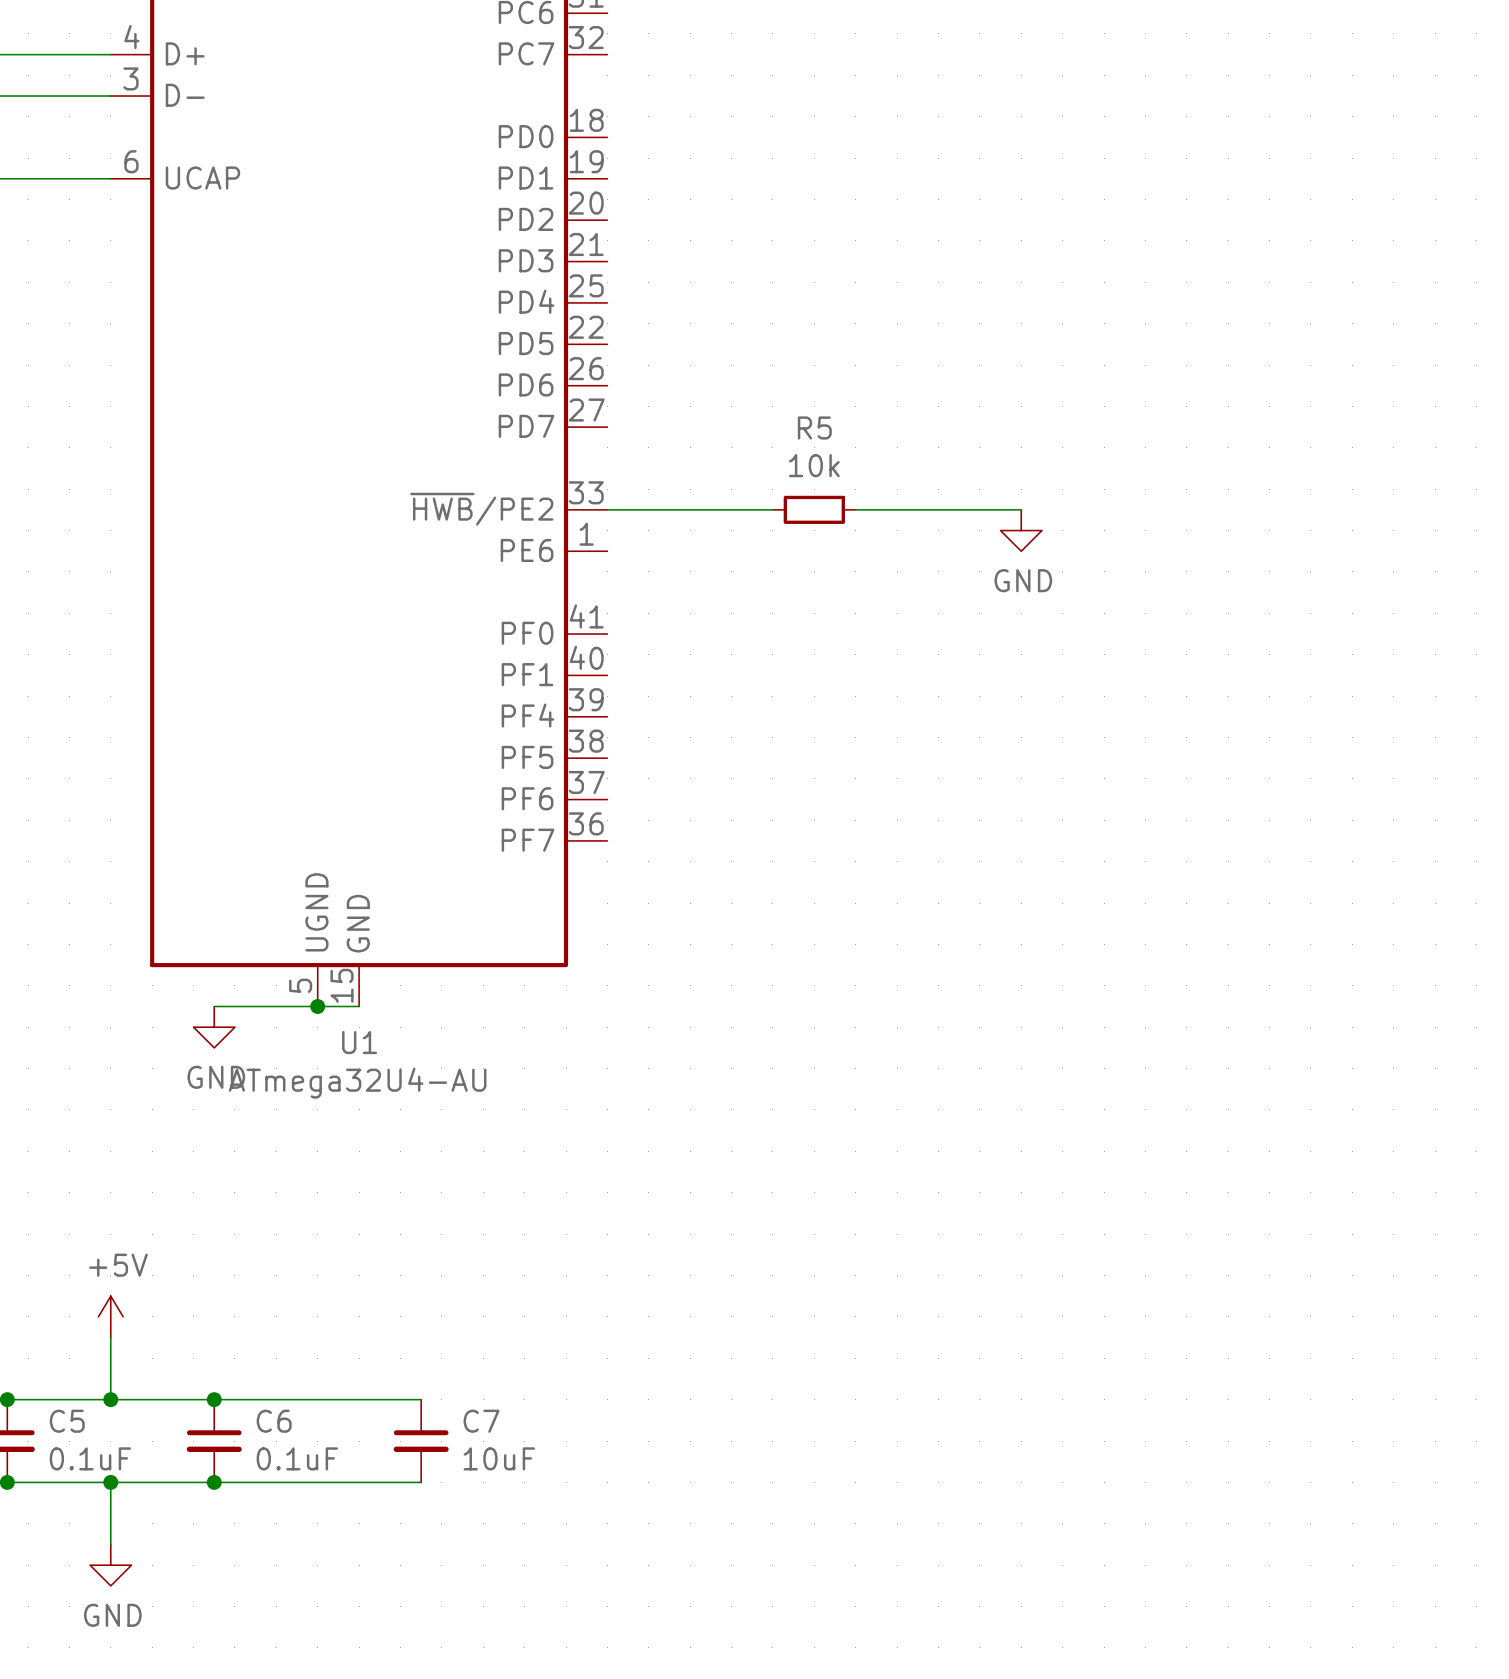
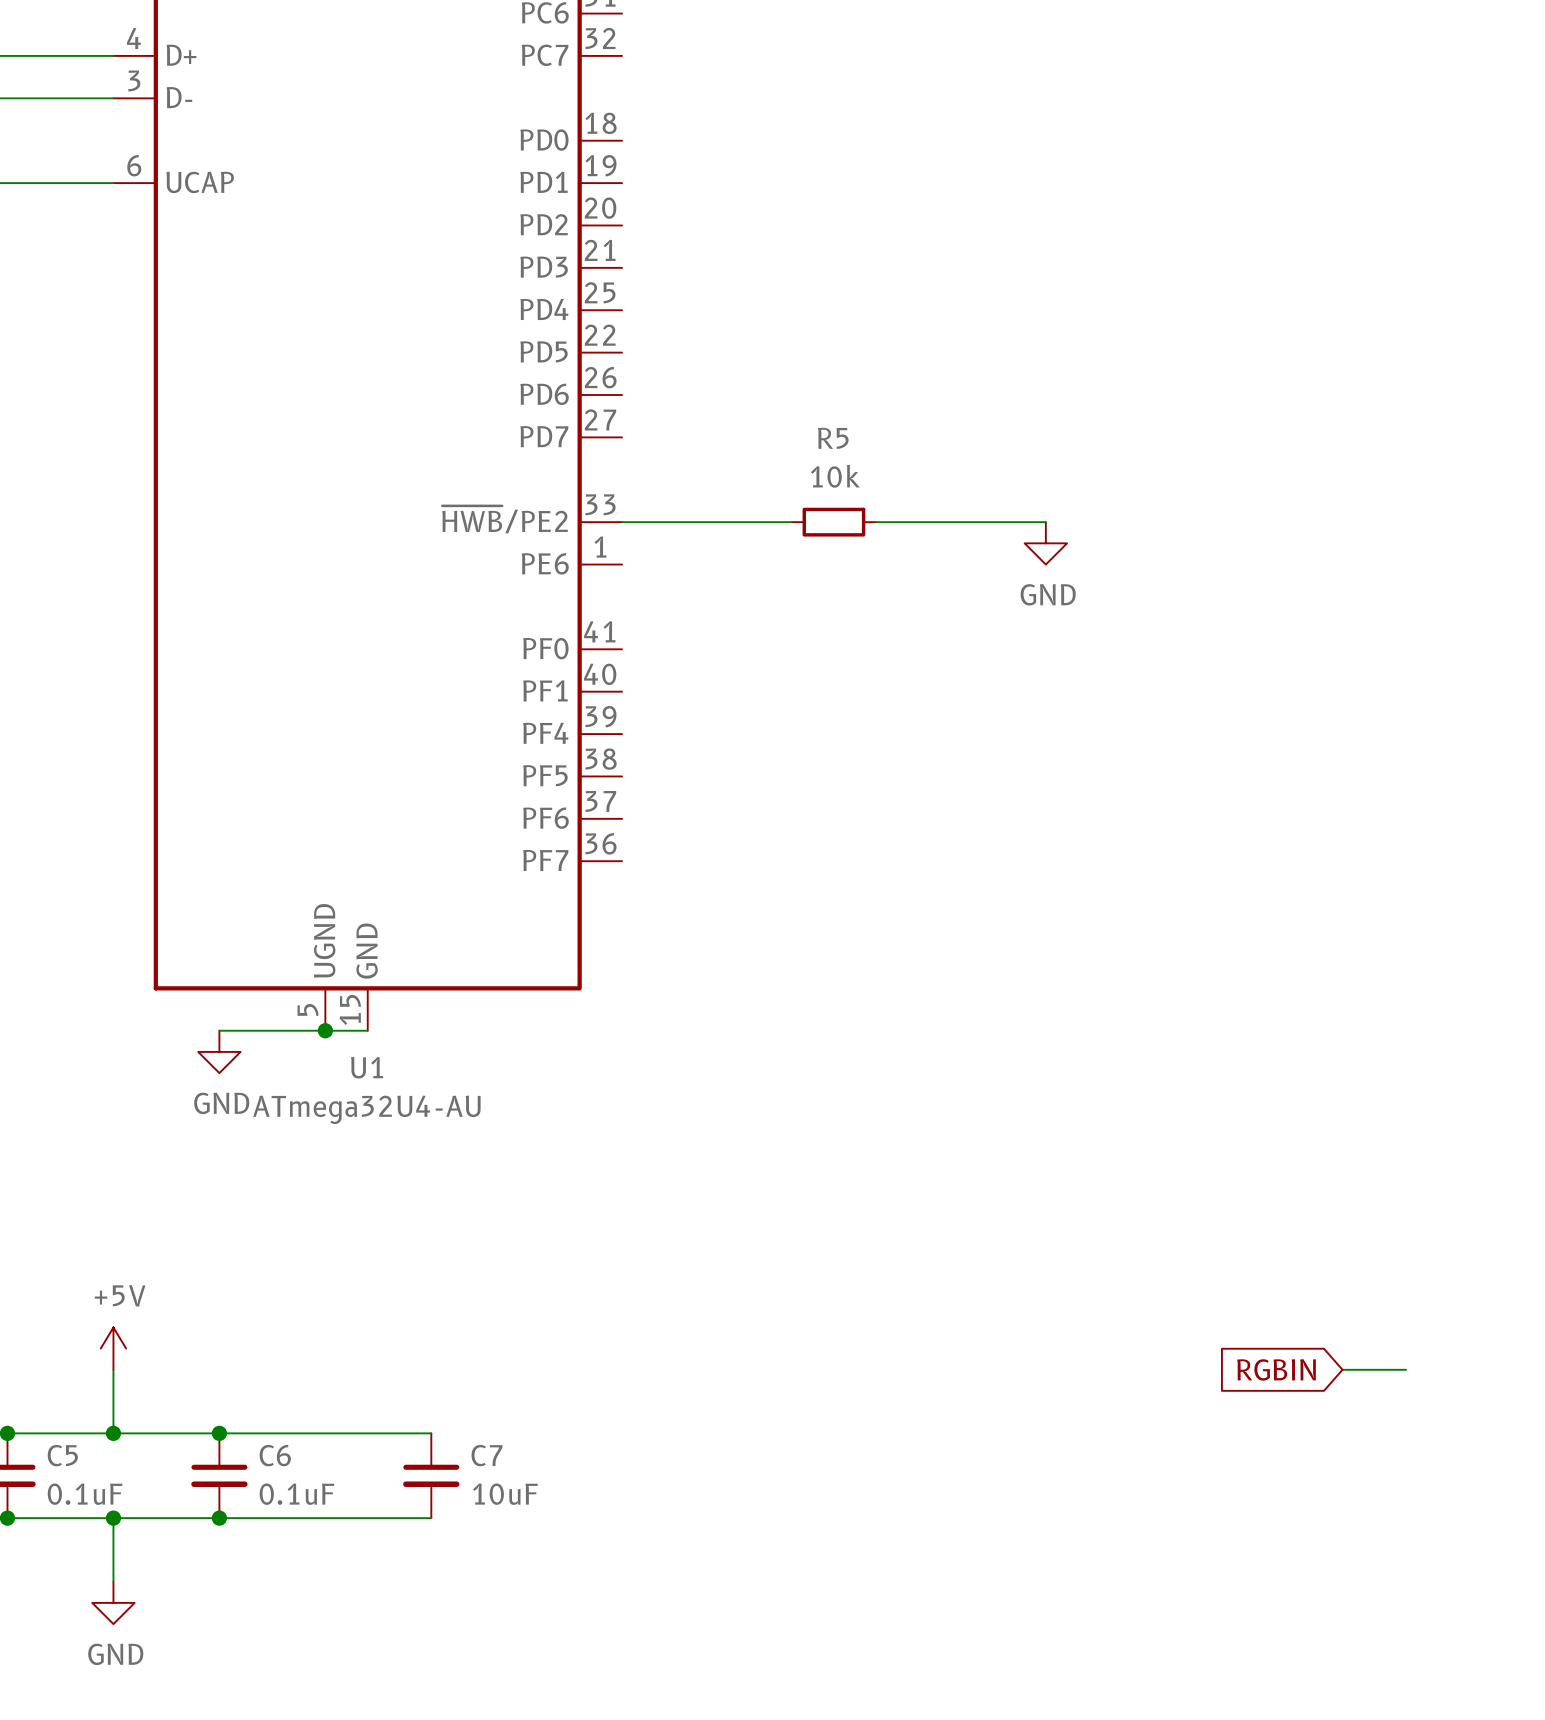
global label: none -> RGBIN (1276, 1369)
wire: none -> (1342, 1369) (1406, 1369)

